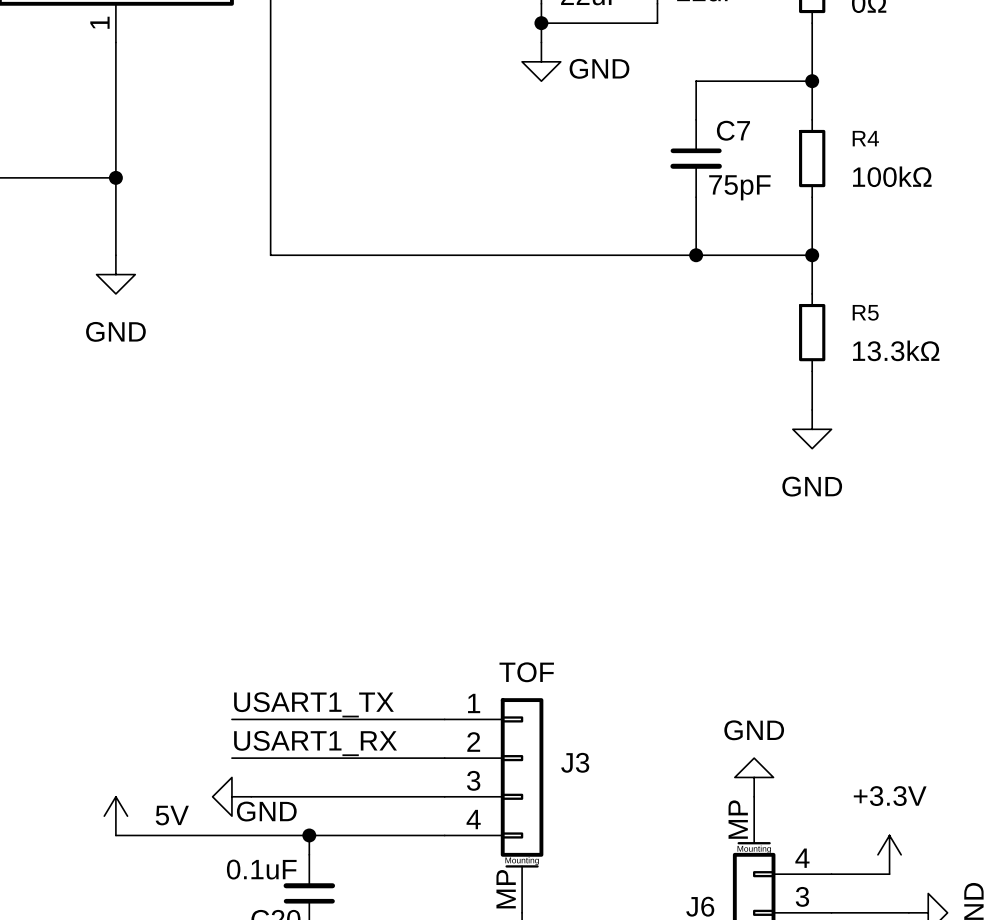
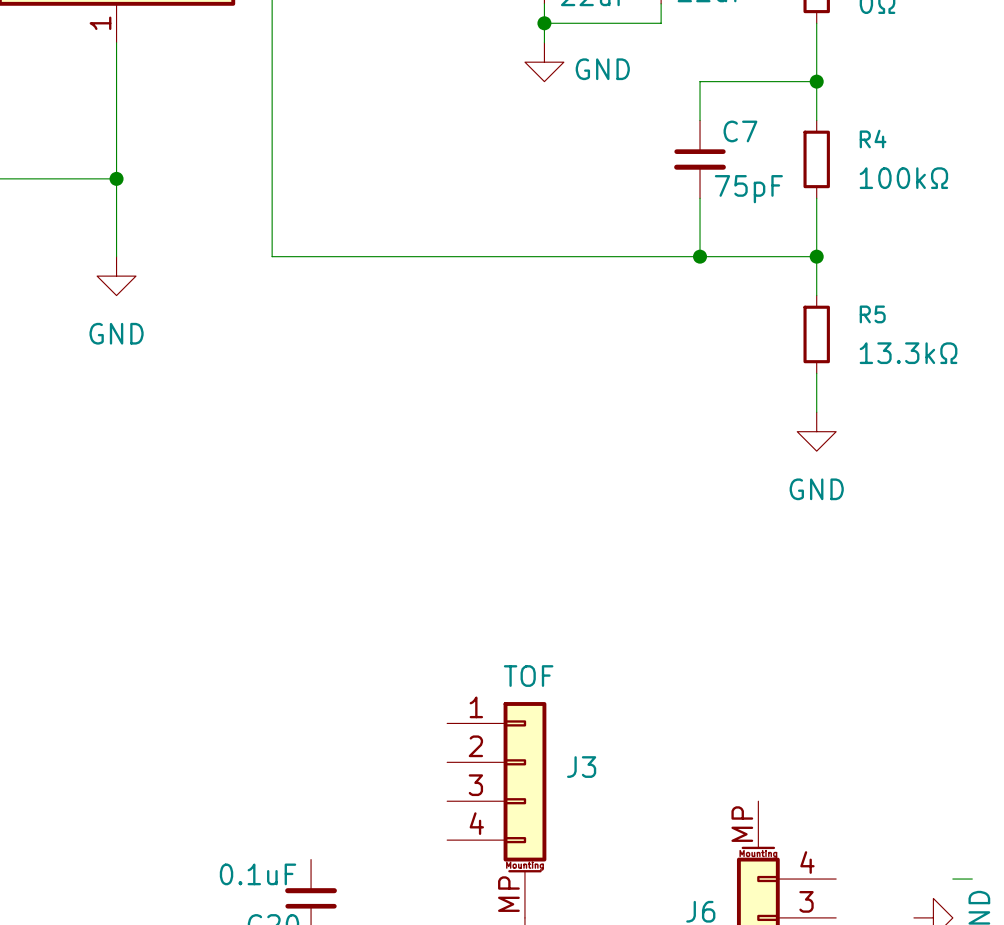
label: USART1_TX (313, 704) -> none
wire: (231, 719) (444, 719) -> none
label: USART1_RX (315, 743) -> none
wire: (231, 758) (444, 758) -> none
power symbol: GND (754, 777) -> none
power symbol: GND (231, 796) -> none
wire: (251, 796) (444, 796) -> none
power symbol: 5V (115, 816) -> none
wire: (115, 835) (444, 835) -> none
wire: (309, 835) (309, 854) -> none
junction: (309, 835) -> none
power symbol: +3.3V (889, 854) -> none
wire: (831, 874) (889, 874) -> none
wire: none -> (952, 879) (972, 879)
wire: (831, 912) (908, 912) -> none

